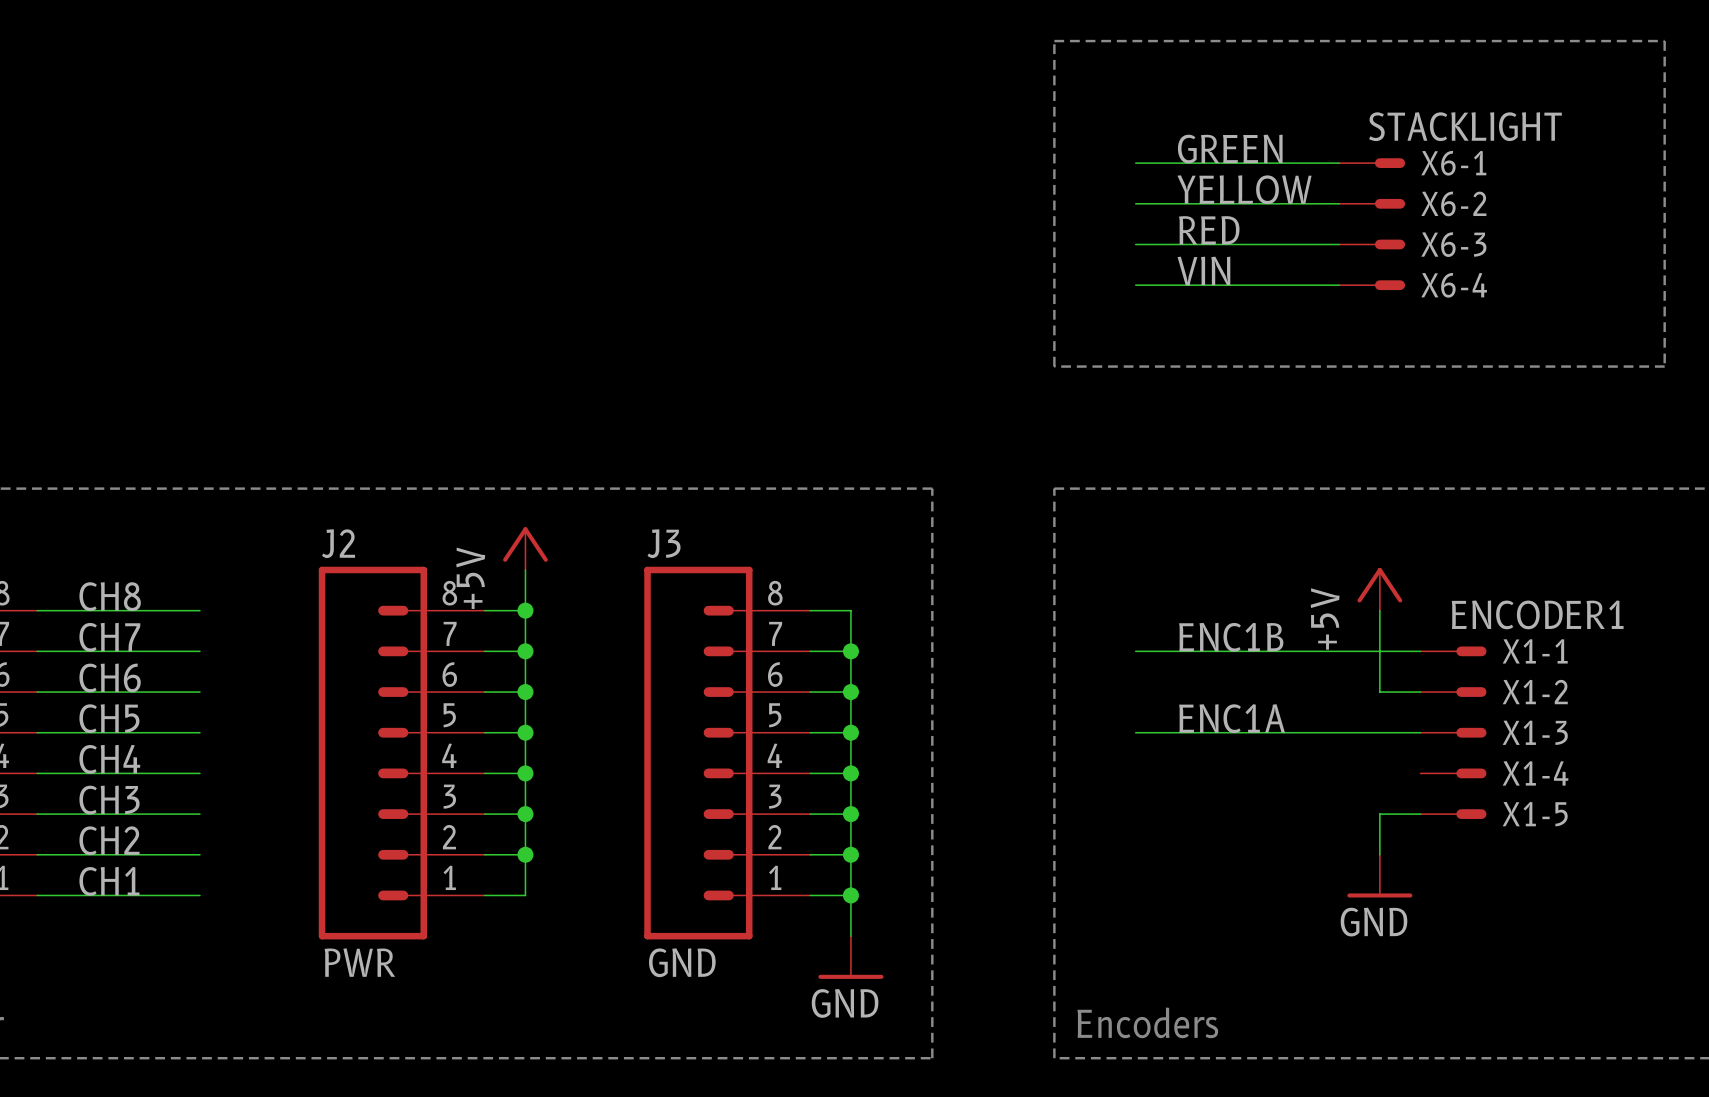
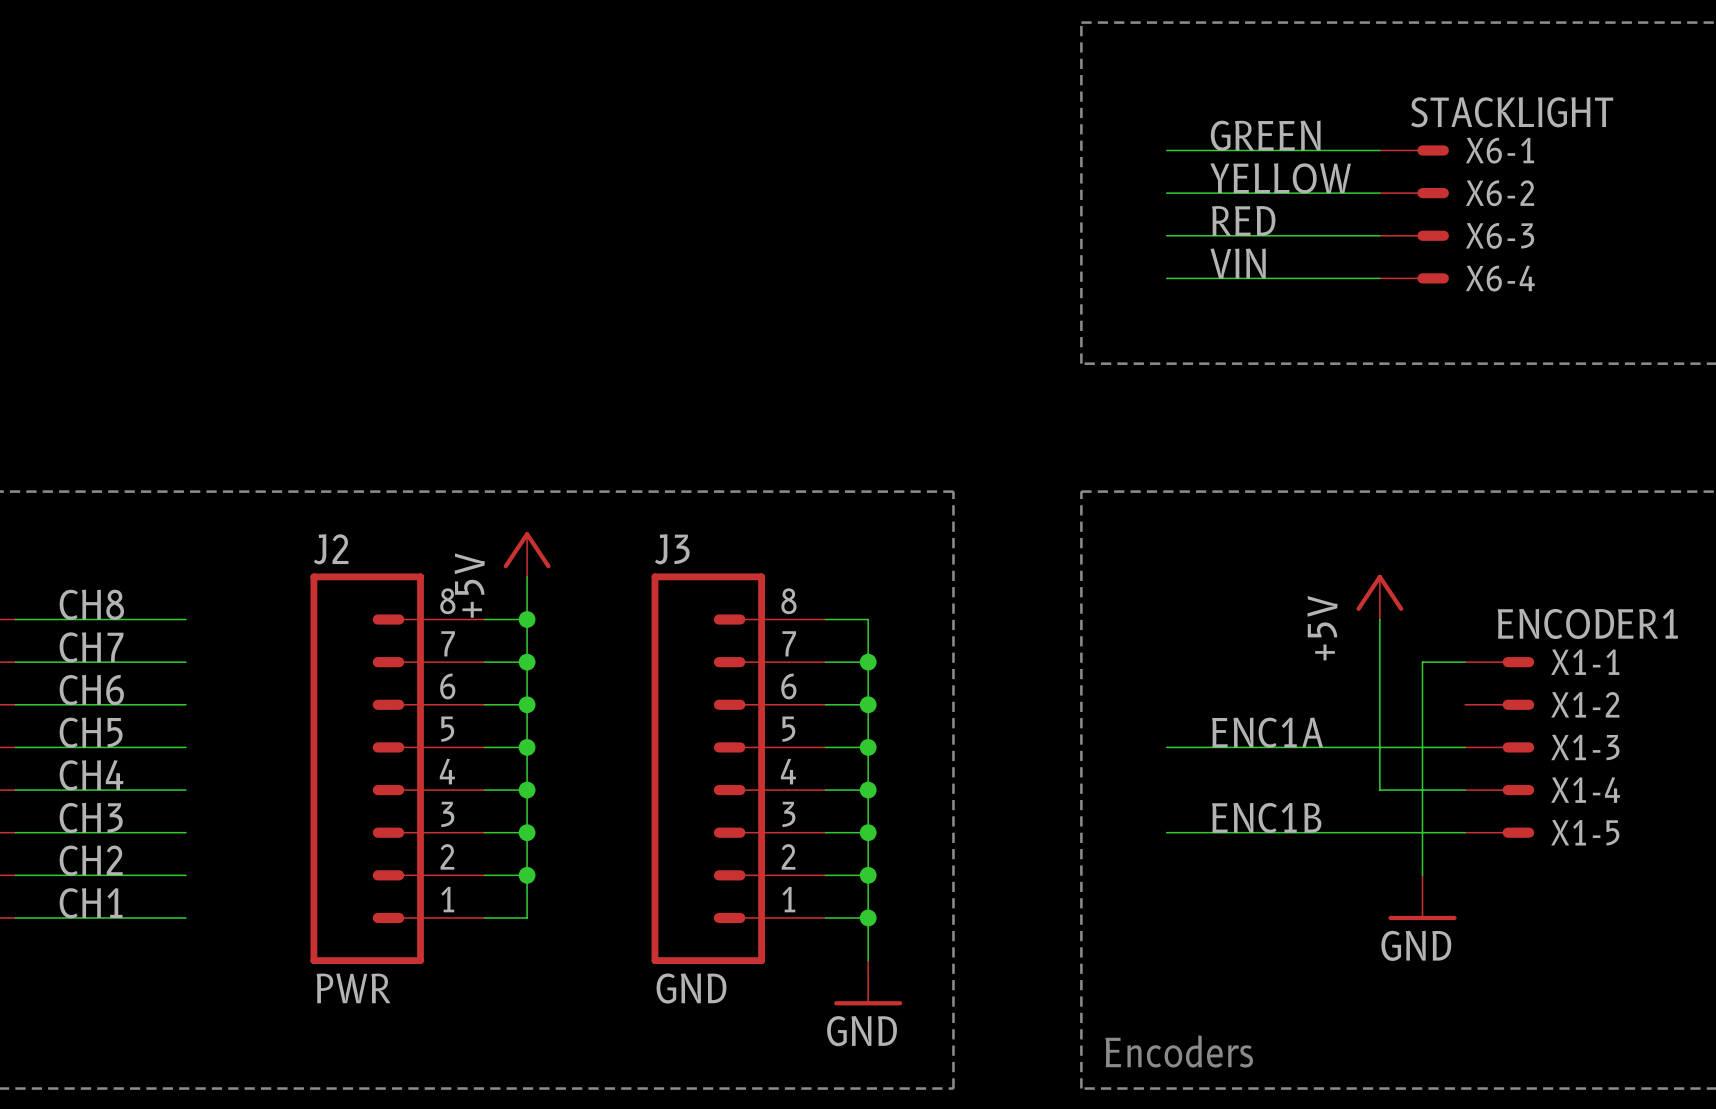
power symbol position: +5V (1379, 589) -> +5V (1379, 597)
wire: none -> (1379, 619) (1379, 790) (1465, 790)
wire: (1379, 610) (1379, 651) (1135, 651) -> none
label position: ENC1B (1231, 637) -> ENC1B (1266, 817)
wire: (1379, 692) (1420, 692) -> (1422, 704) (1422, 832) (1166, 832)

